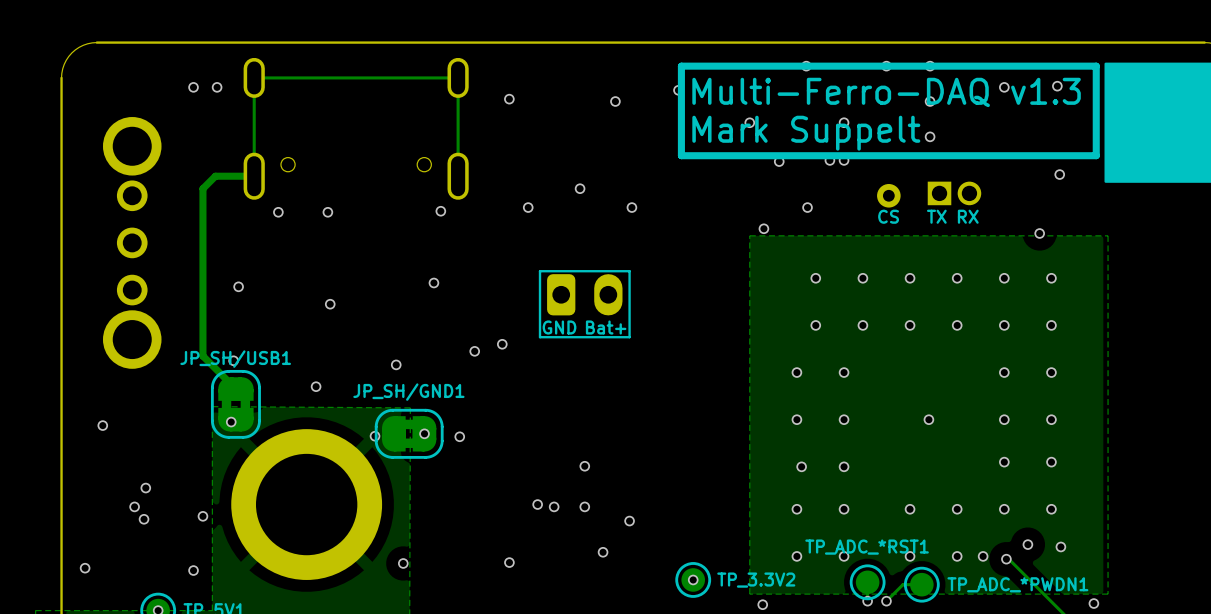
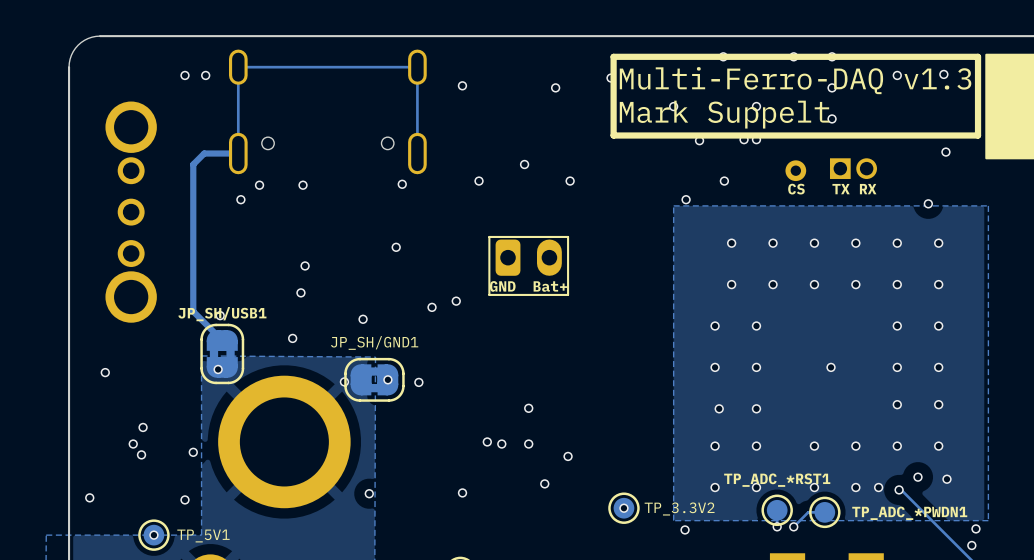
via: none -> (240, 199)
via: (238, 286) -> none
via: none -> (300, 292)

